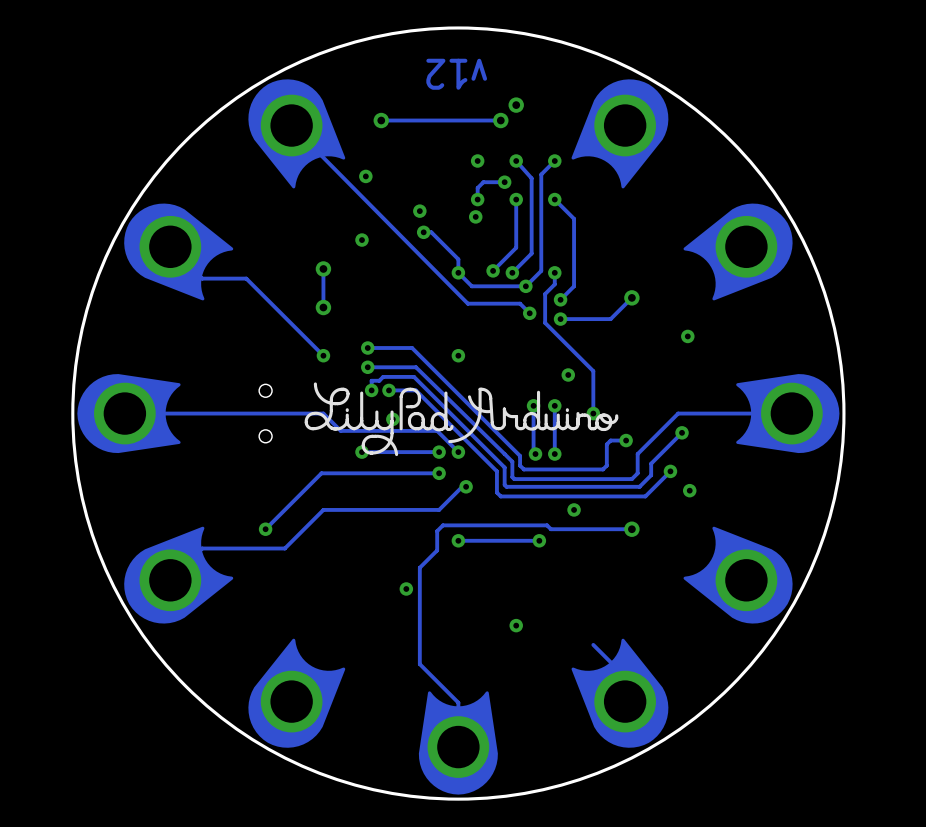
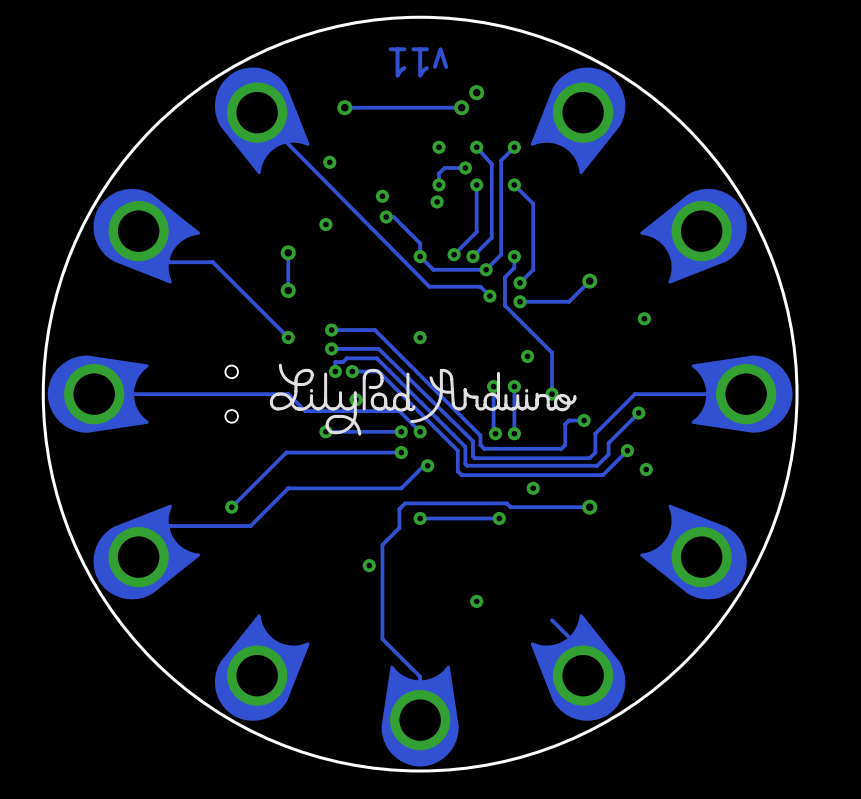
text: v12 (456, 74) -> v11 (418, 62)

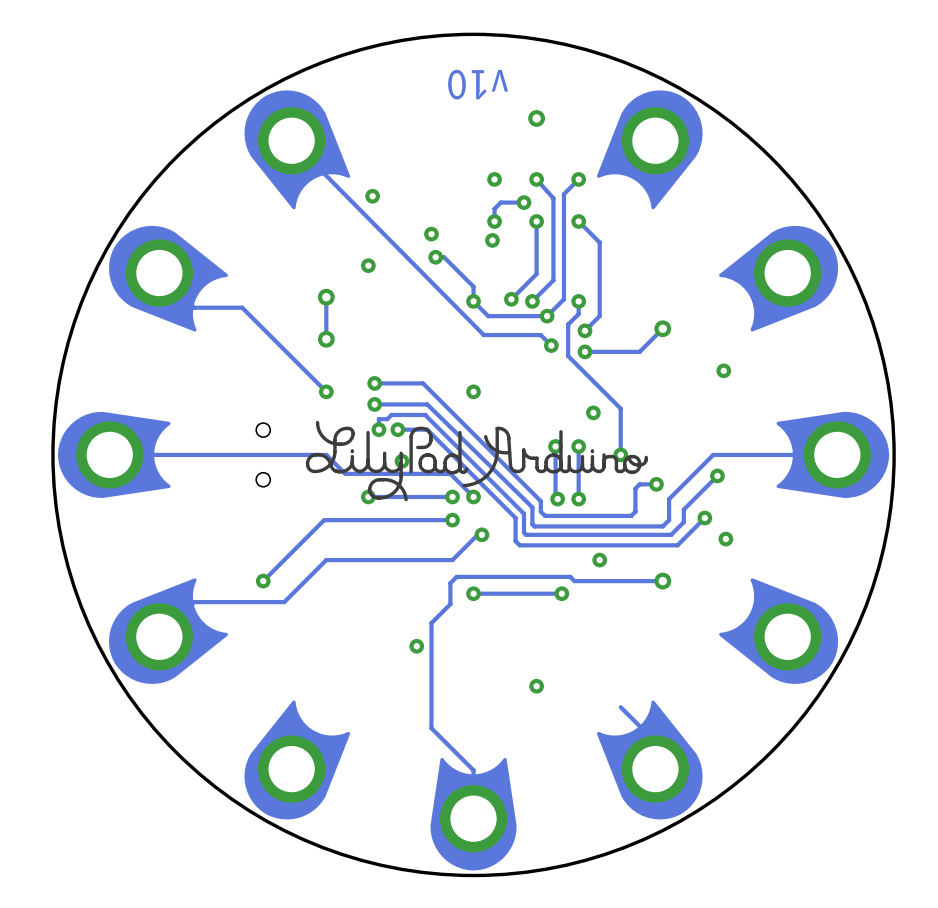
text: v11 (418, 62) -> v10 (478, 84)
via: (344, 107) -> none
track: (461, 107) (344, 107) -> none
via: (461, 107) -> none

